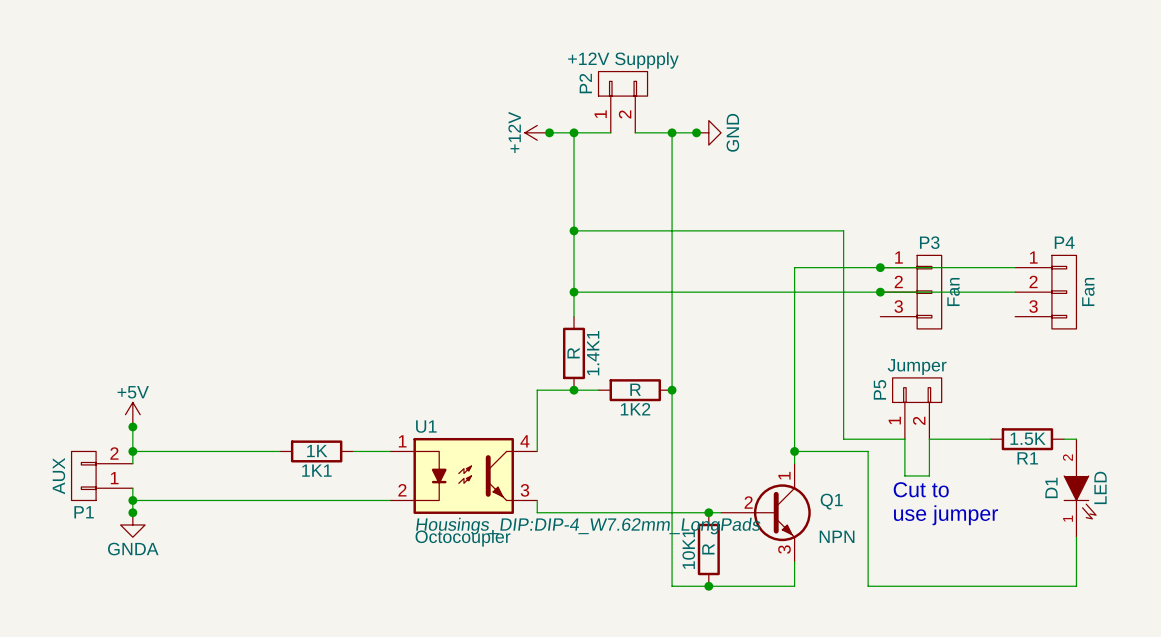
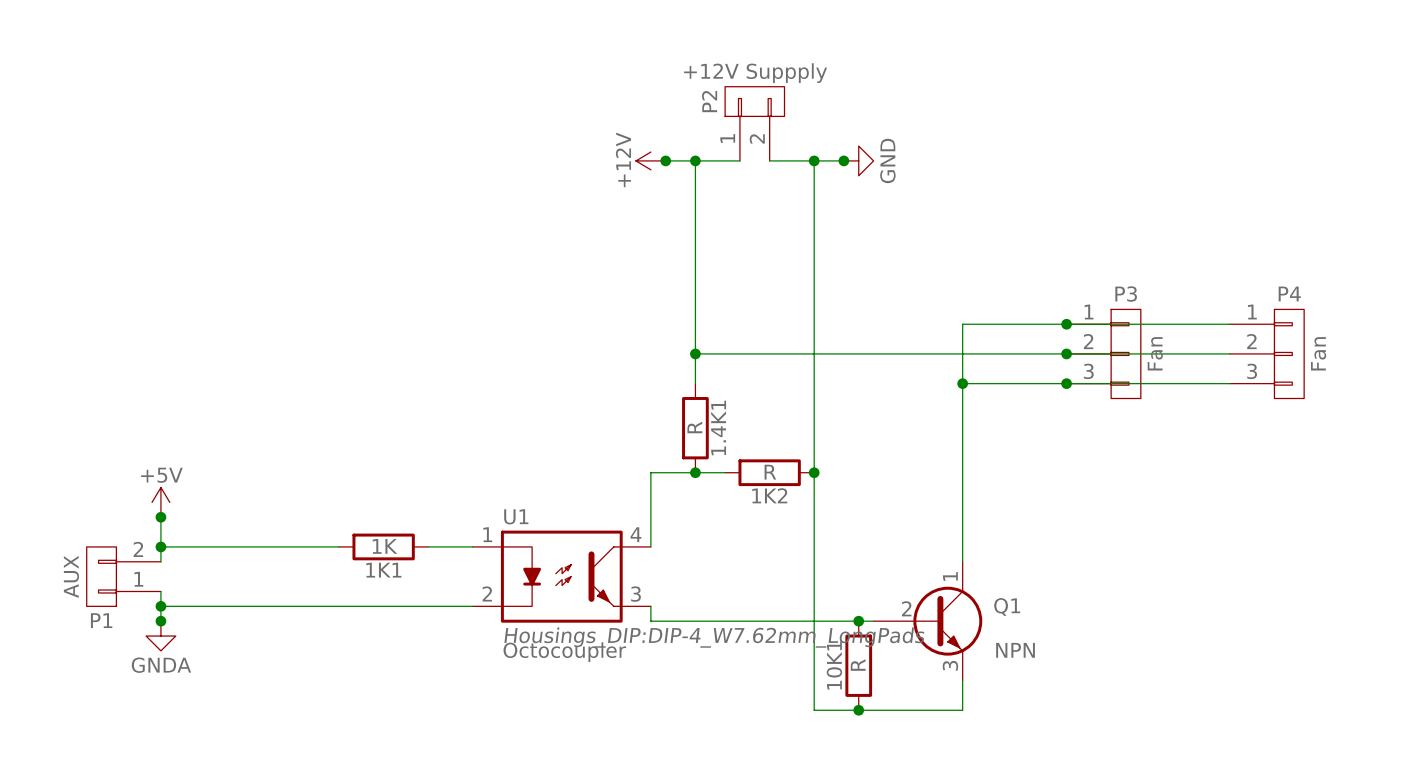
wire: (574, 230) (843, 230) (843, 439) (904, 439) (904, 475) (929, 475) (929, 439) (990, 439) -> none
junction: (574, 230) -> none
wire: none -> (962, 383) (1229, 383)
junction: none -> (962, 383)
junction: none -> (1066, 383)
P5: Jumper (917, 408) -> none
R1: 1.5K (1027, 439) -> none
wire: (1064, 439) (1076, 439) -> none
wire: (794, 451) (868, 451) (868, 586) (1076, 586) (1076, 537) -> none
junction: (794, 451) -> none
D1: LED (1080, 488) -> none
text: Cut to (921, 489) -> none
text: use jumper (946, 515) -> none

